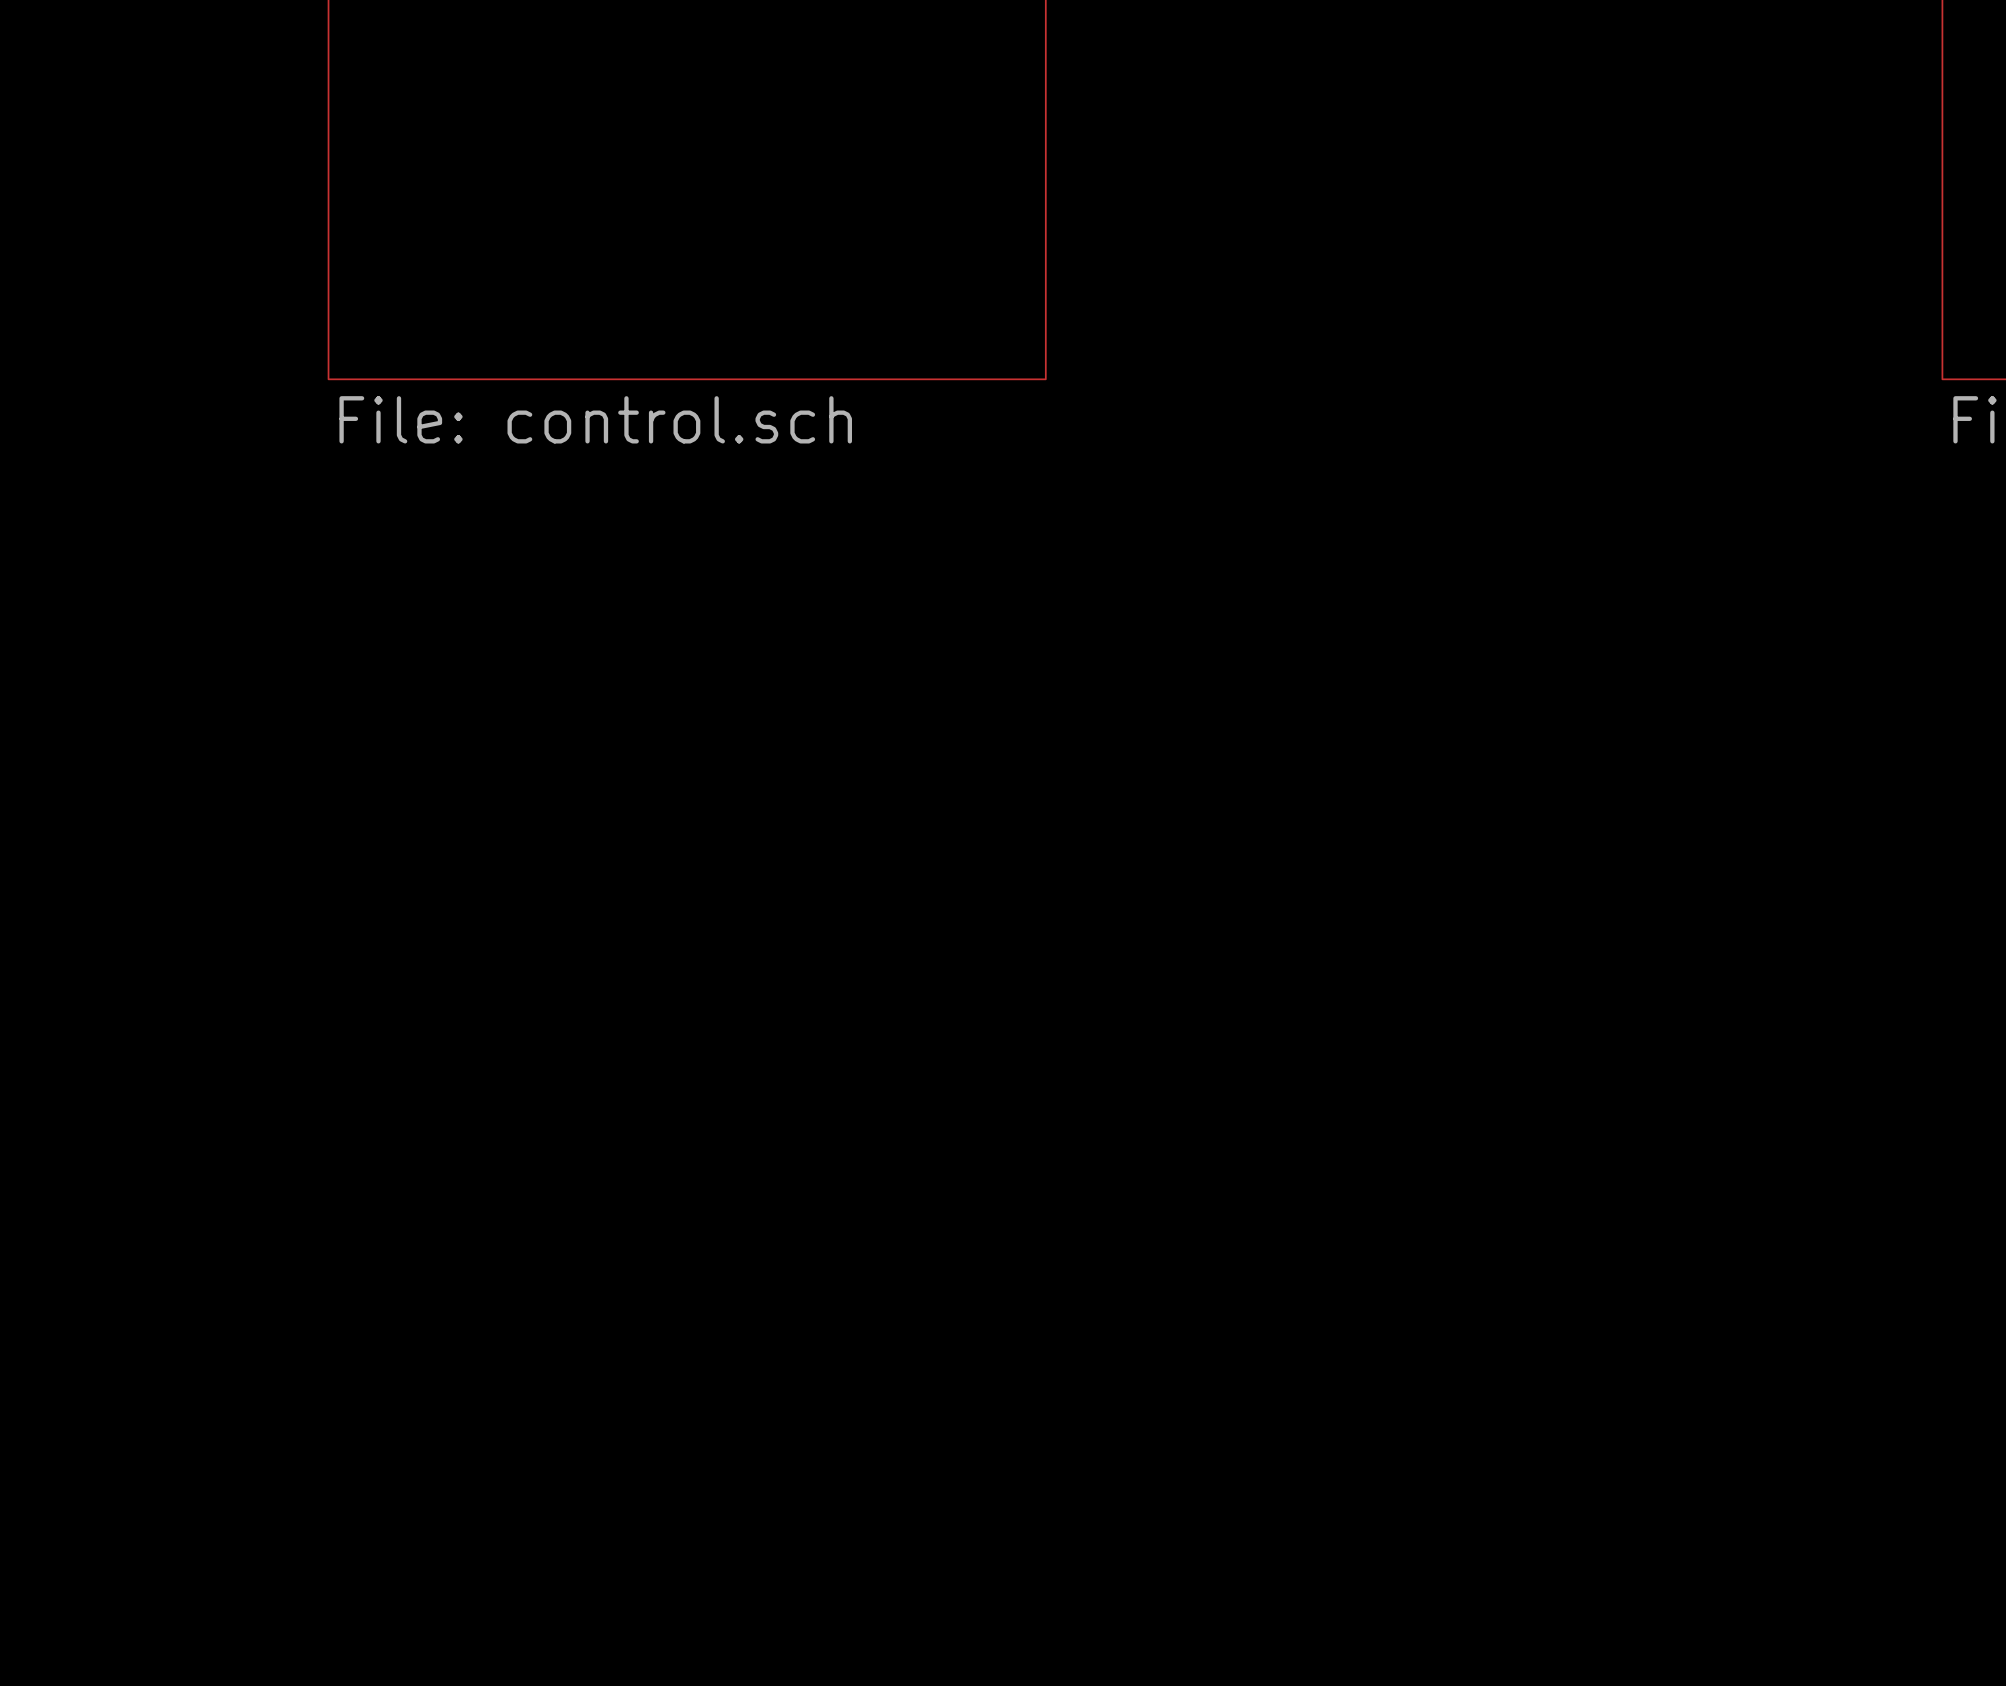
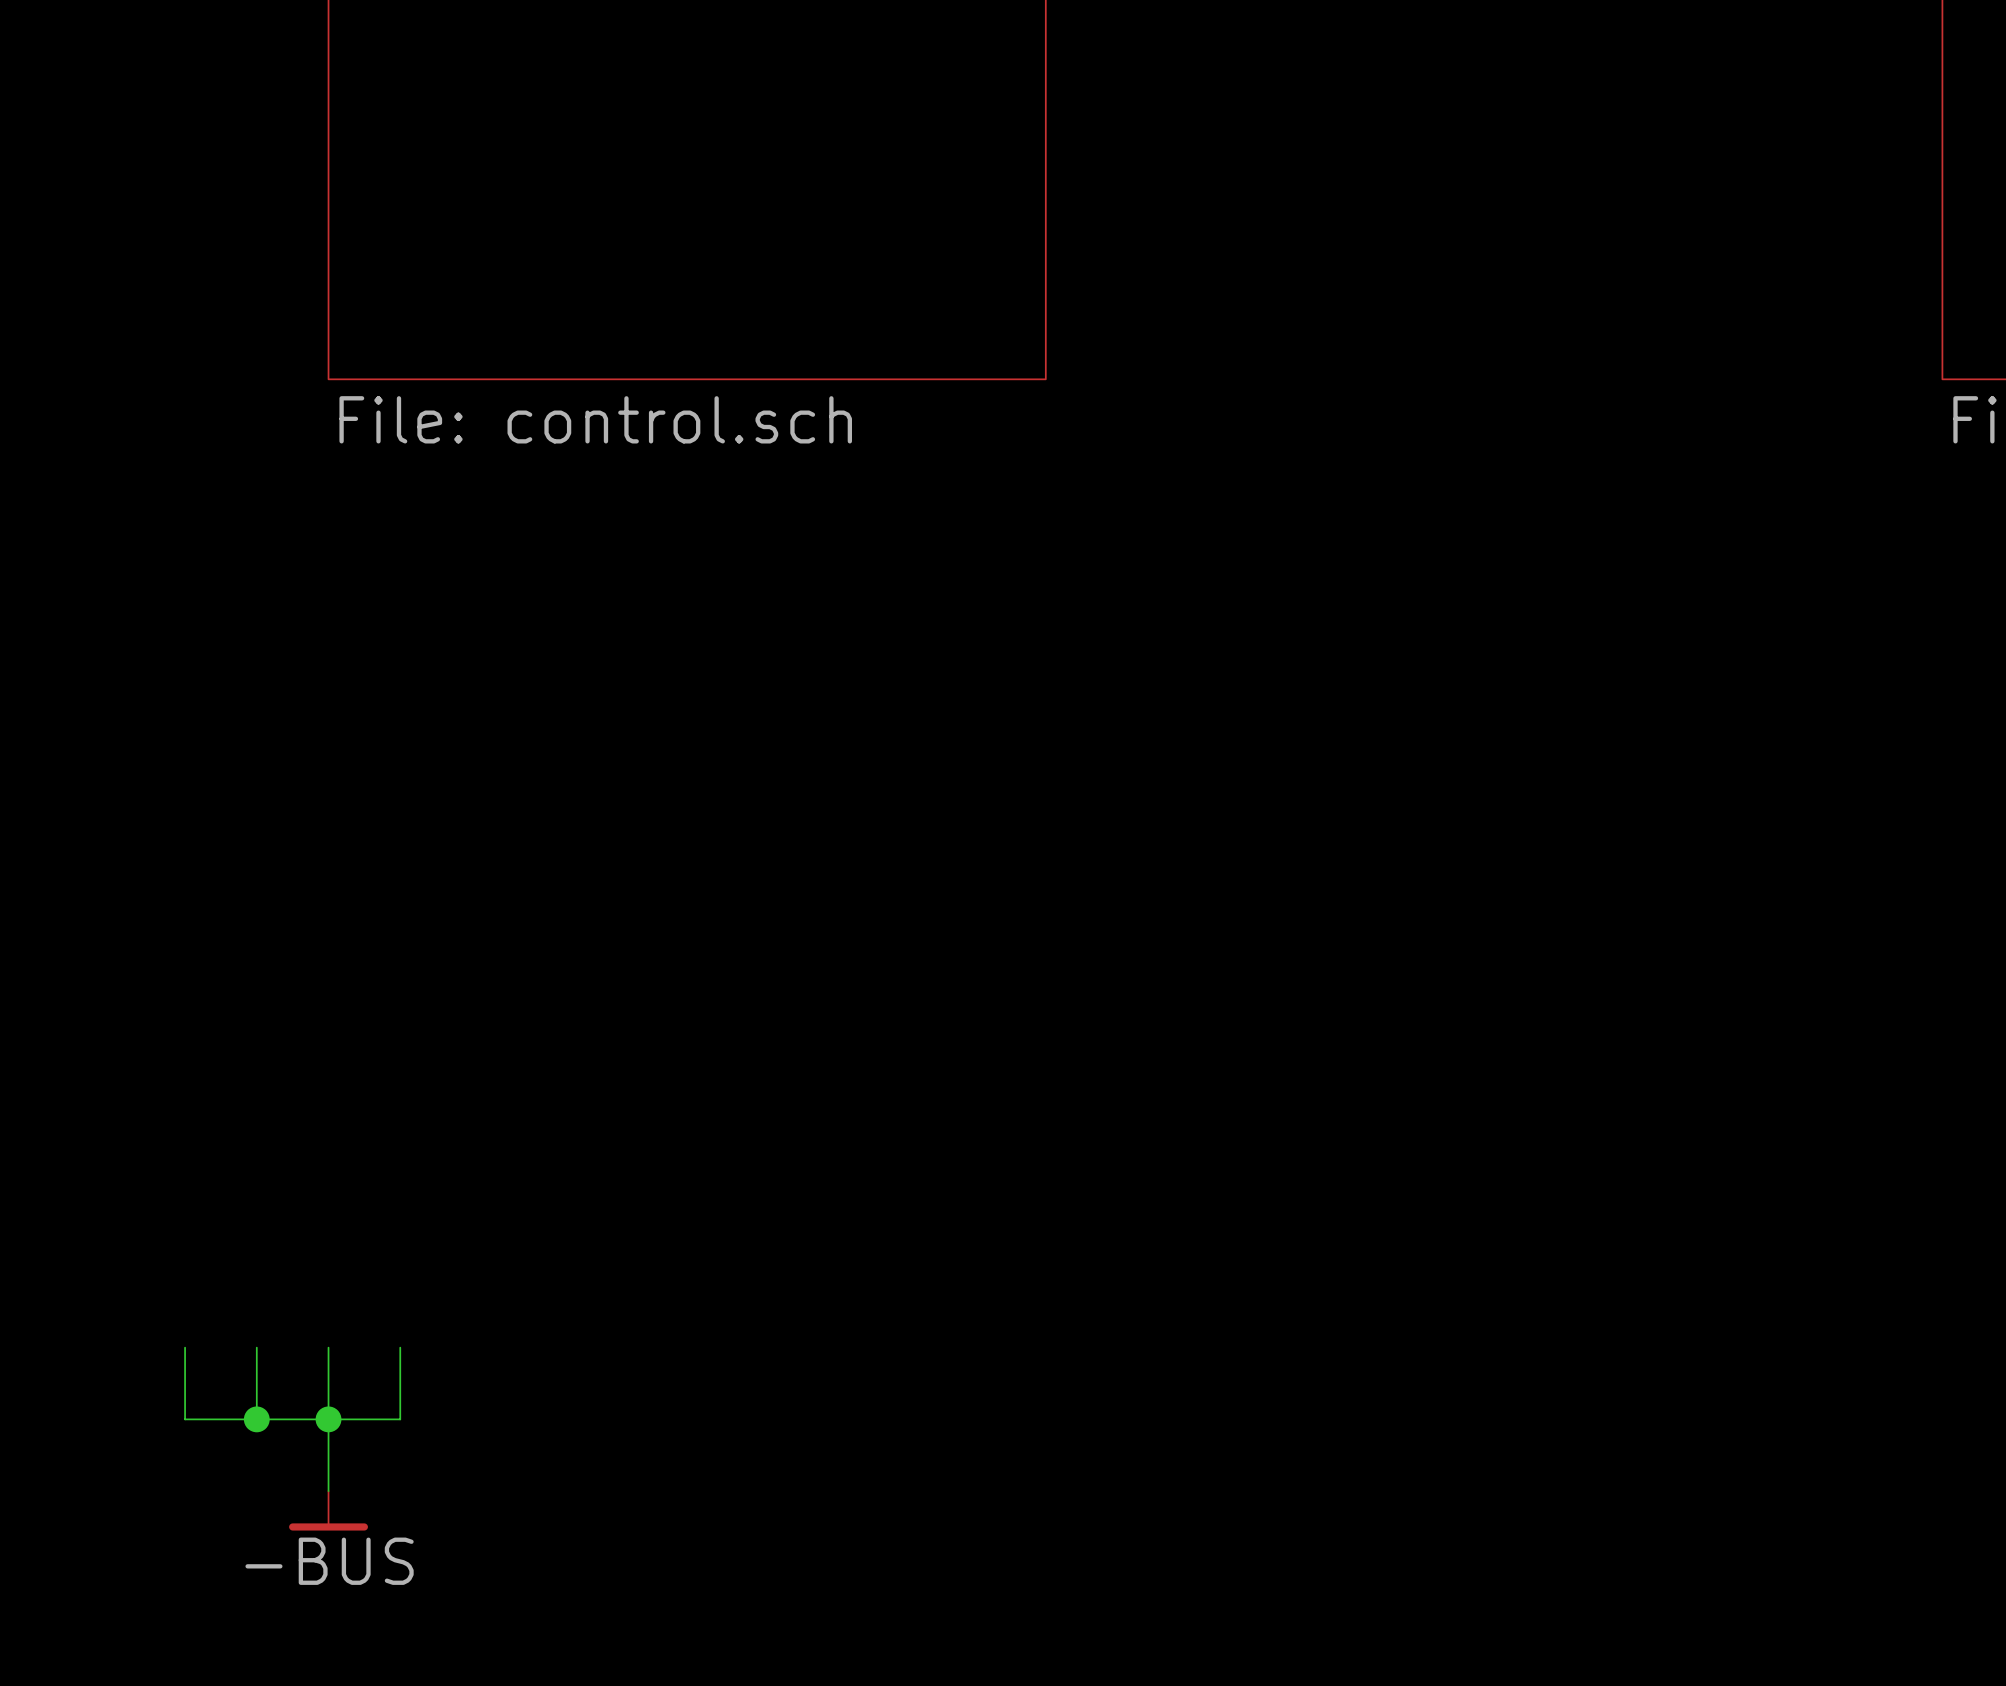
wire: none -> (185, 1347) (185, 1419) (400, 1419) (400, 1347)
wire: none -> (256, 1347) (256, 1419)
wire: none -> (328, 1347) (328, 1491)
junction: none -> (256, 1419)
junction: none -> (328, 1419)
power symbol: none -> -BUS (328, 1510)

